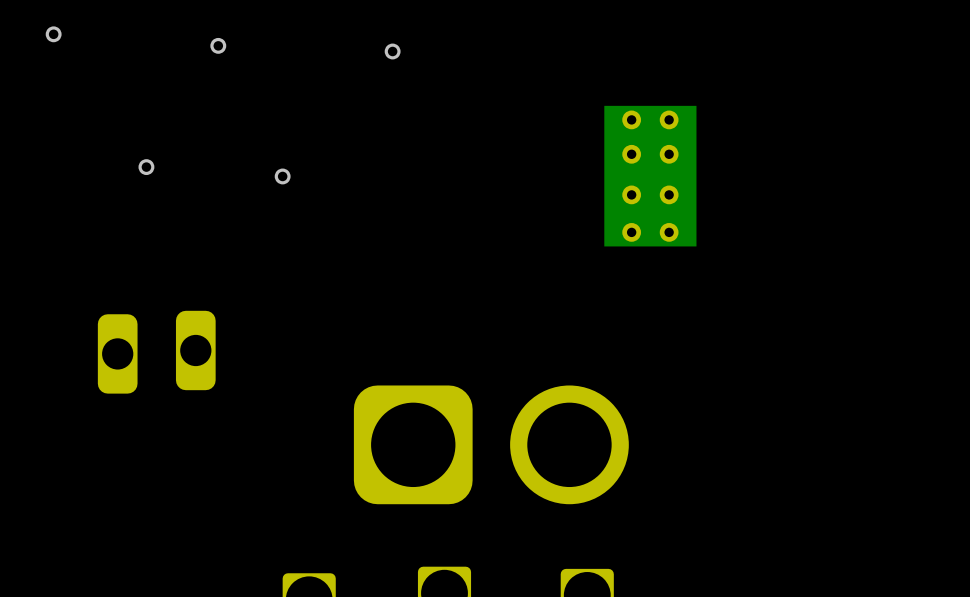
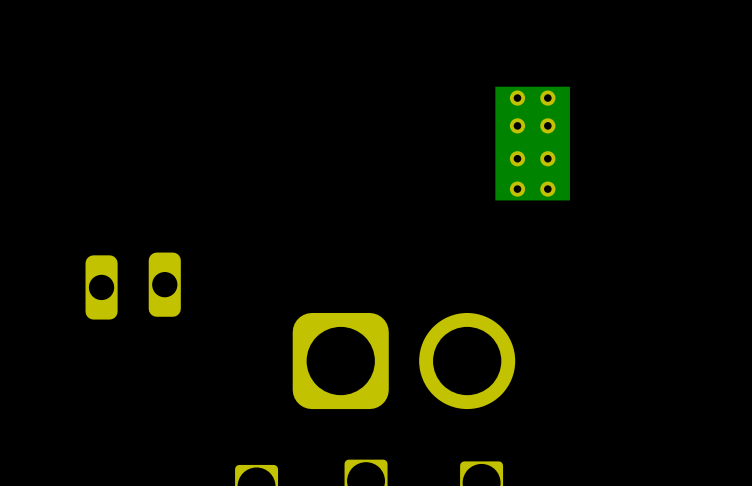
via: (53, 34) -> none
via: (218, 45) -> none
via: (392, 51) -> none
via: (146, 167) -> none
via: (282, 176) -> none

